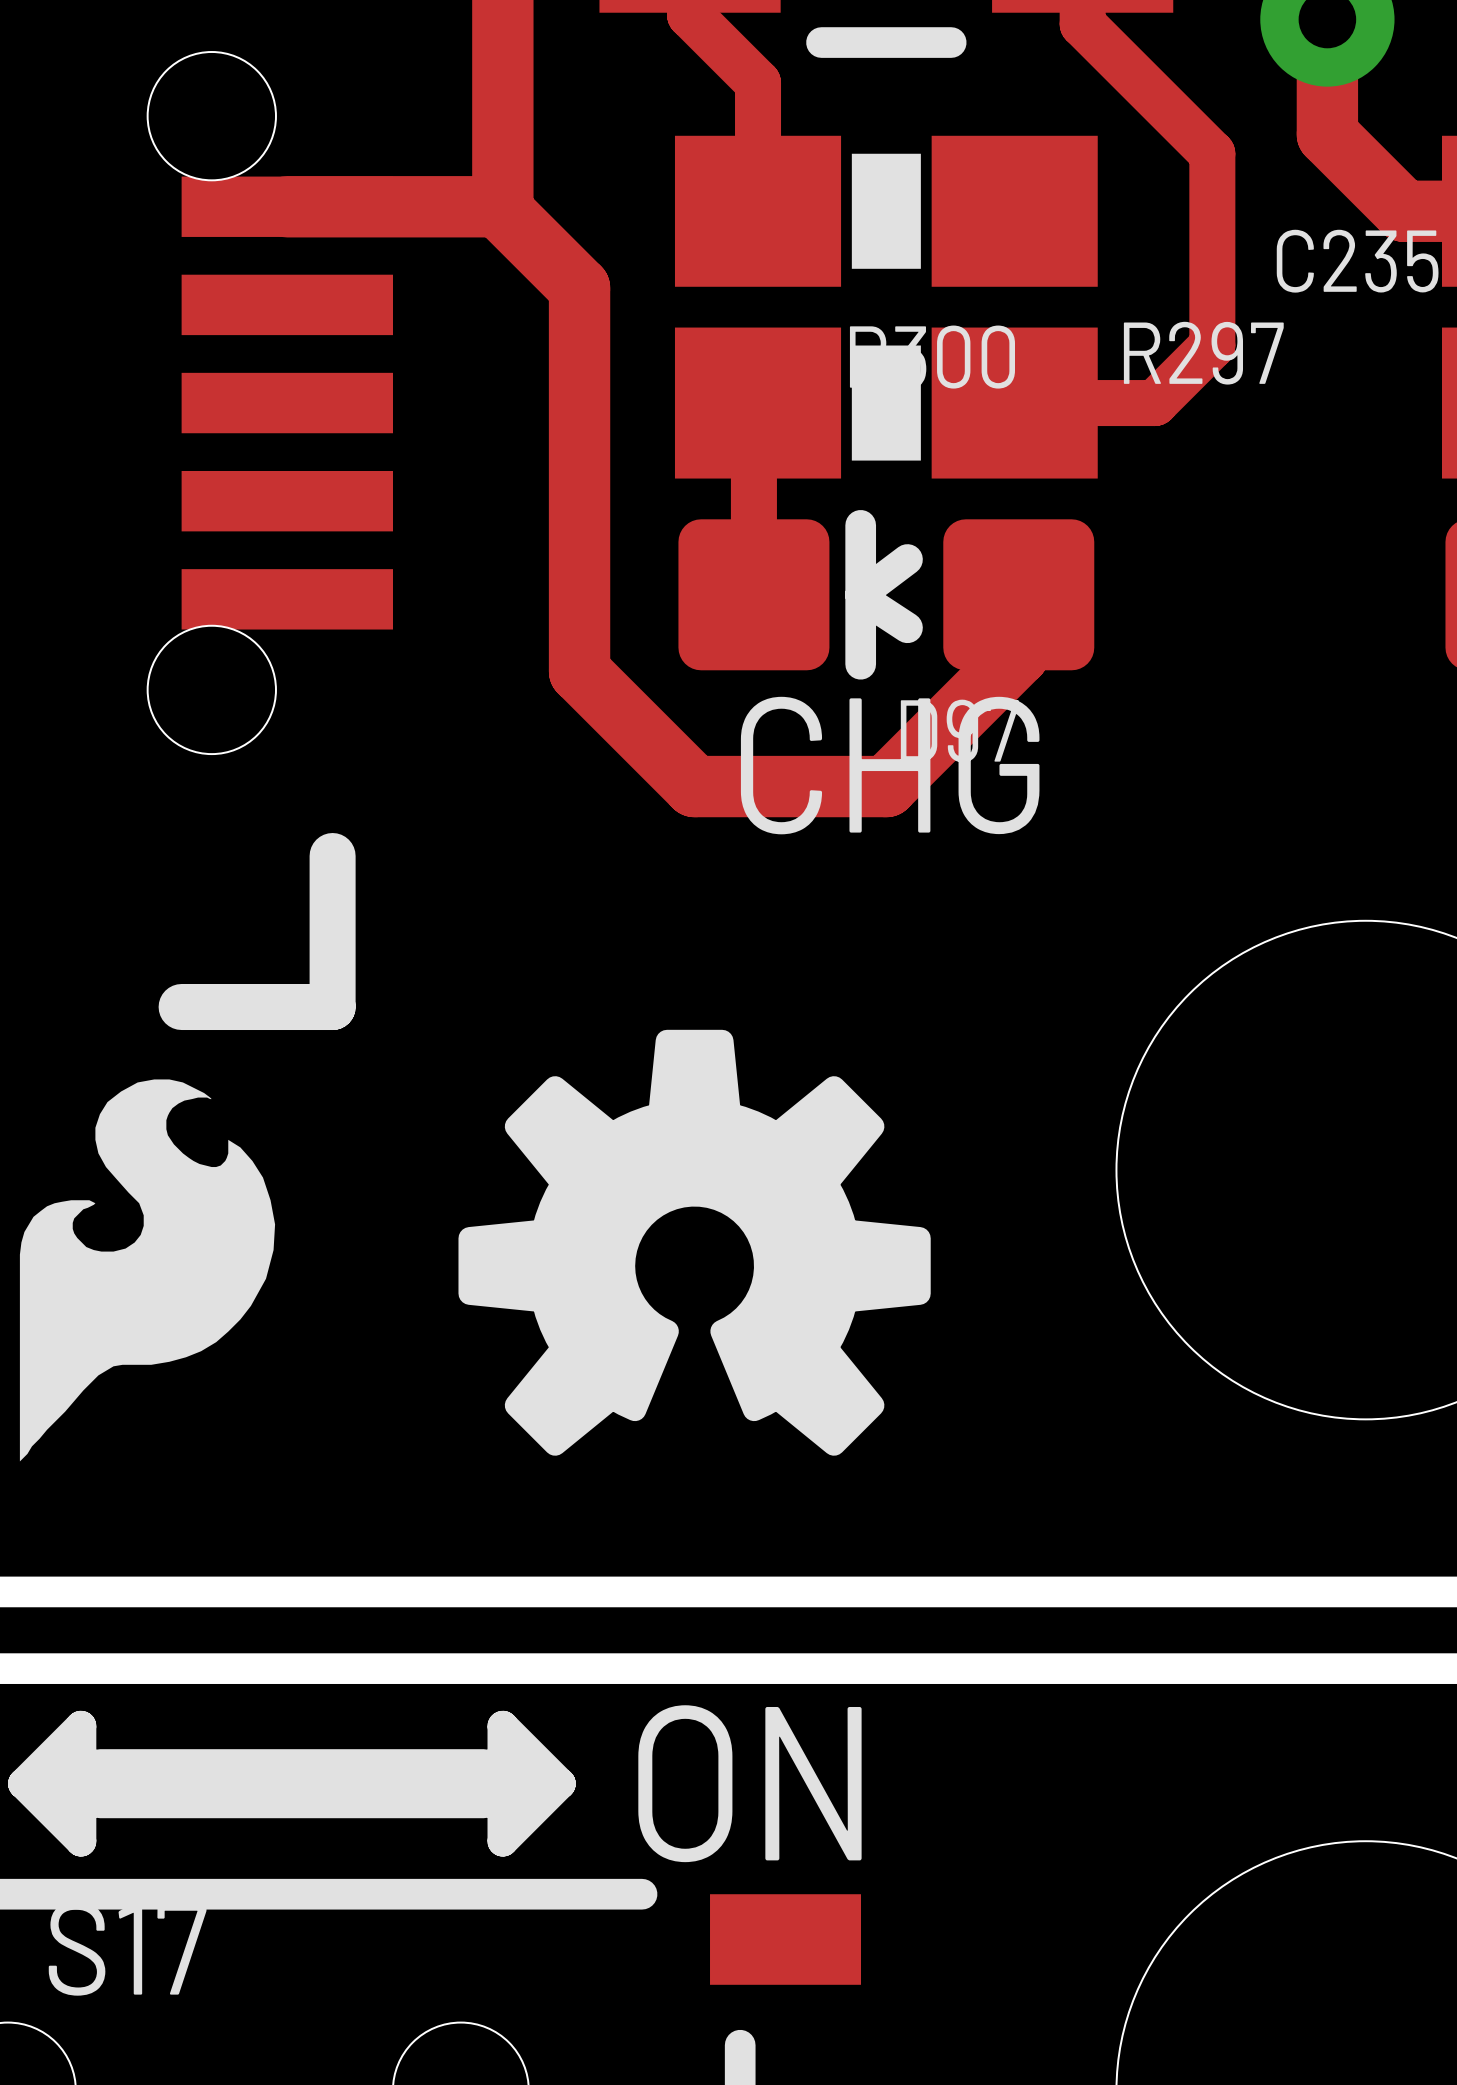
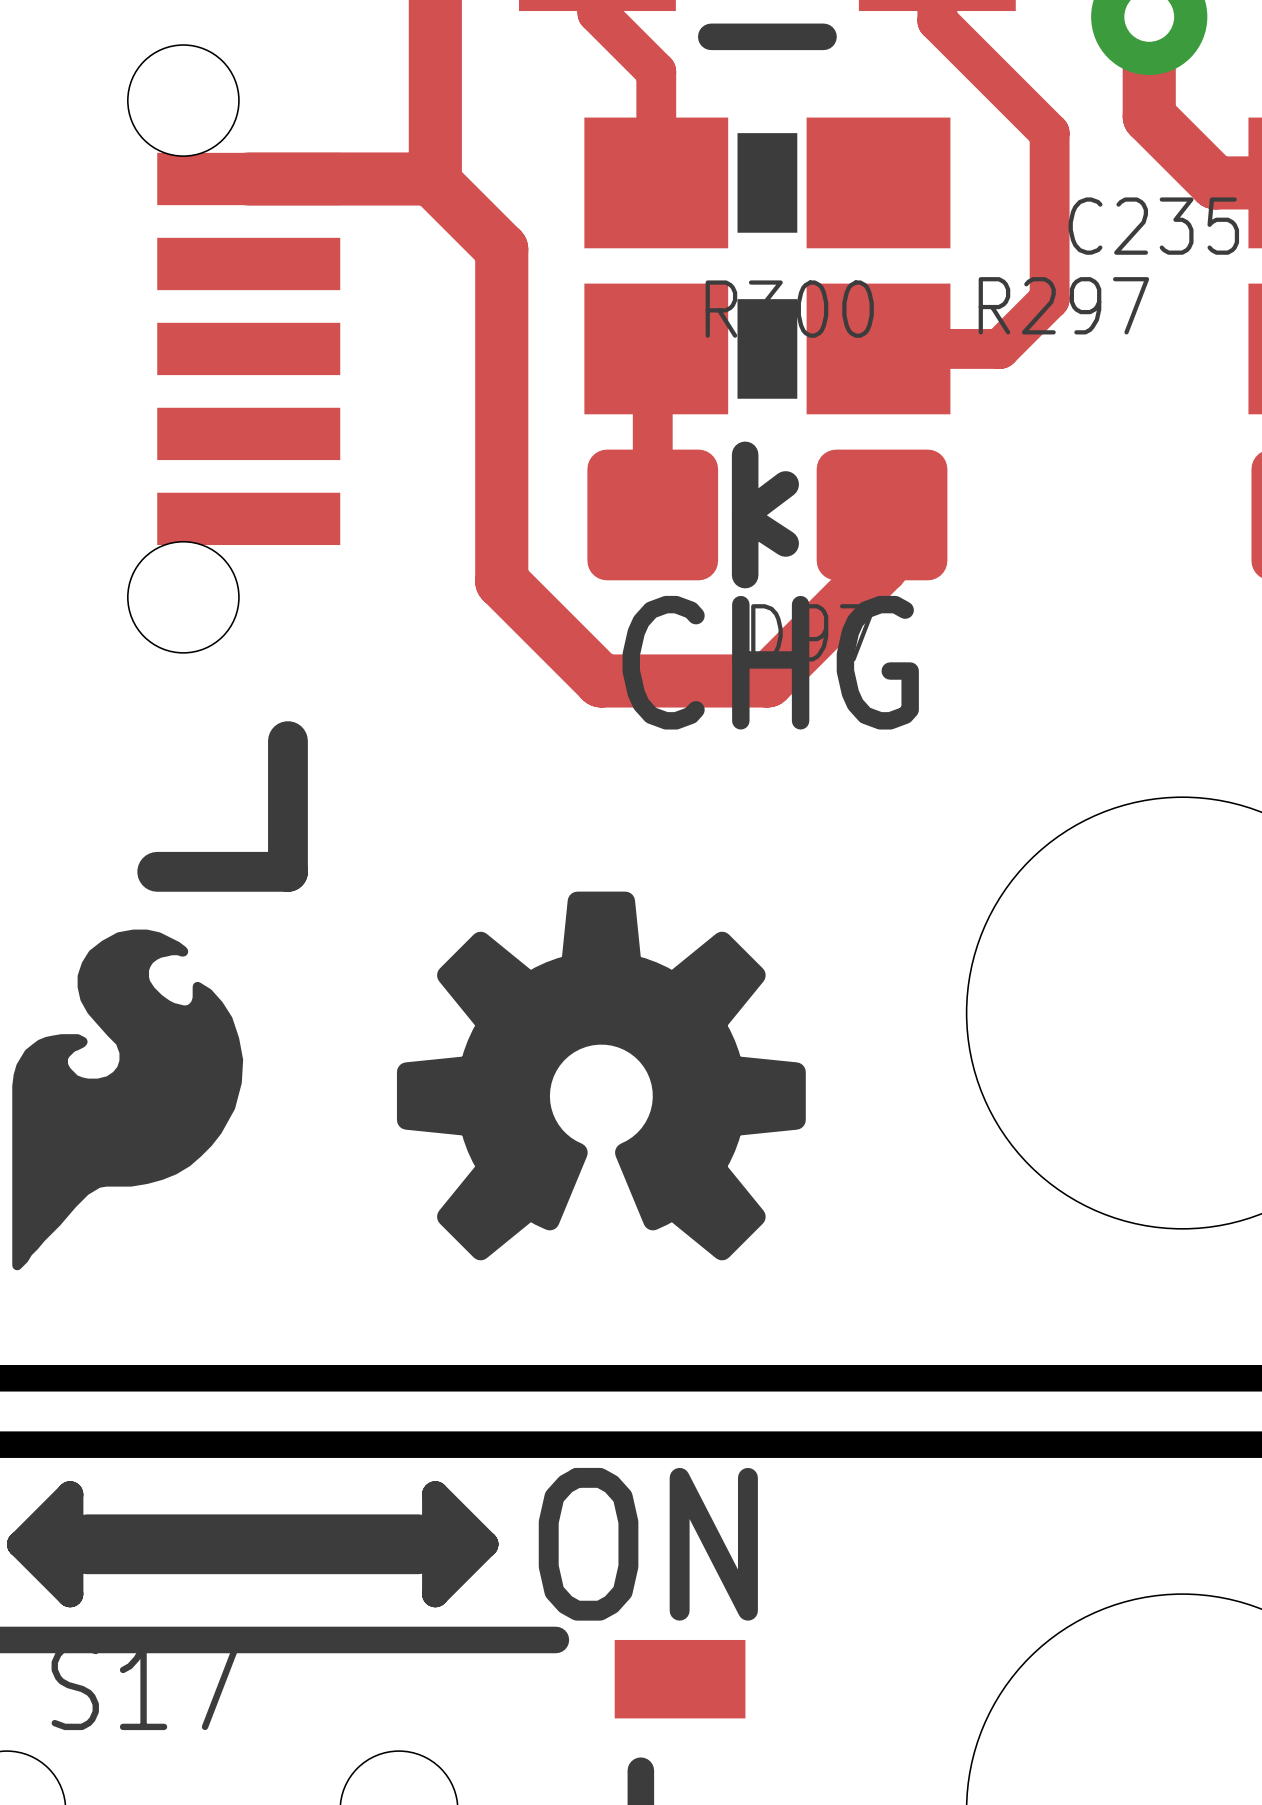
drawing shape: [19, 1079, 276, 1463] -> [12, 929, 244, 1271]

